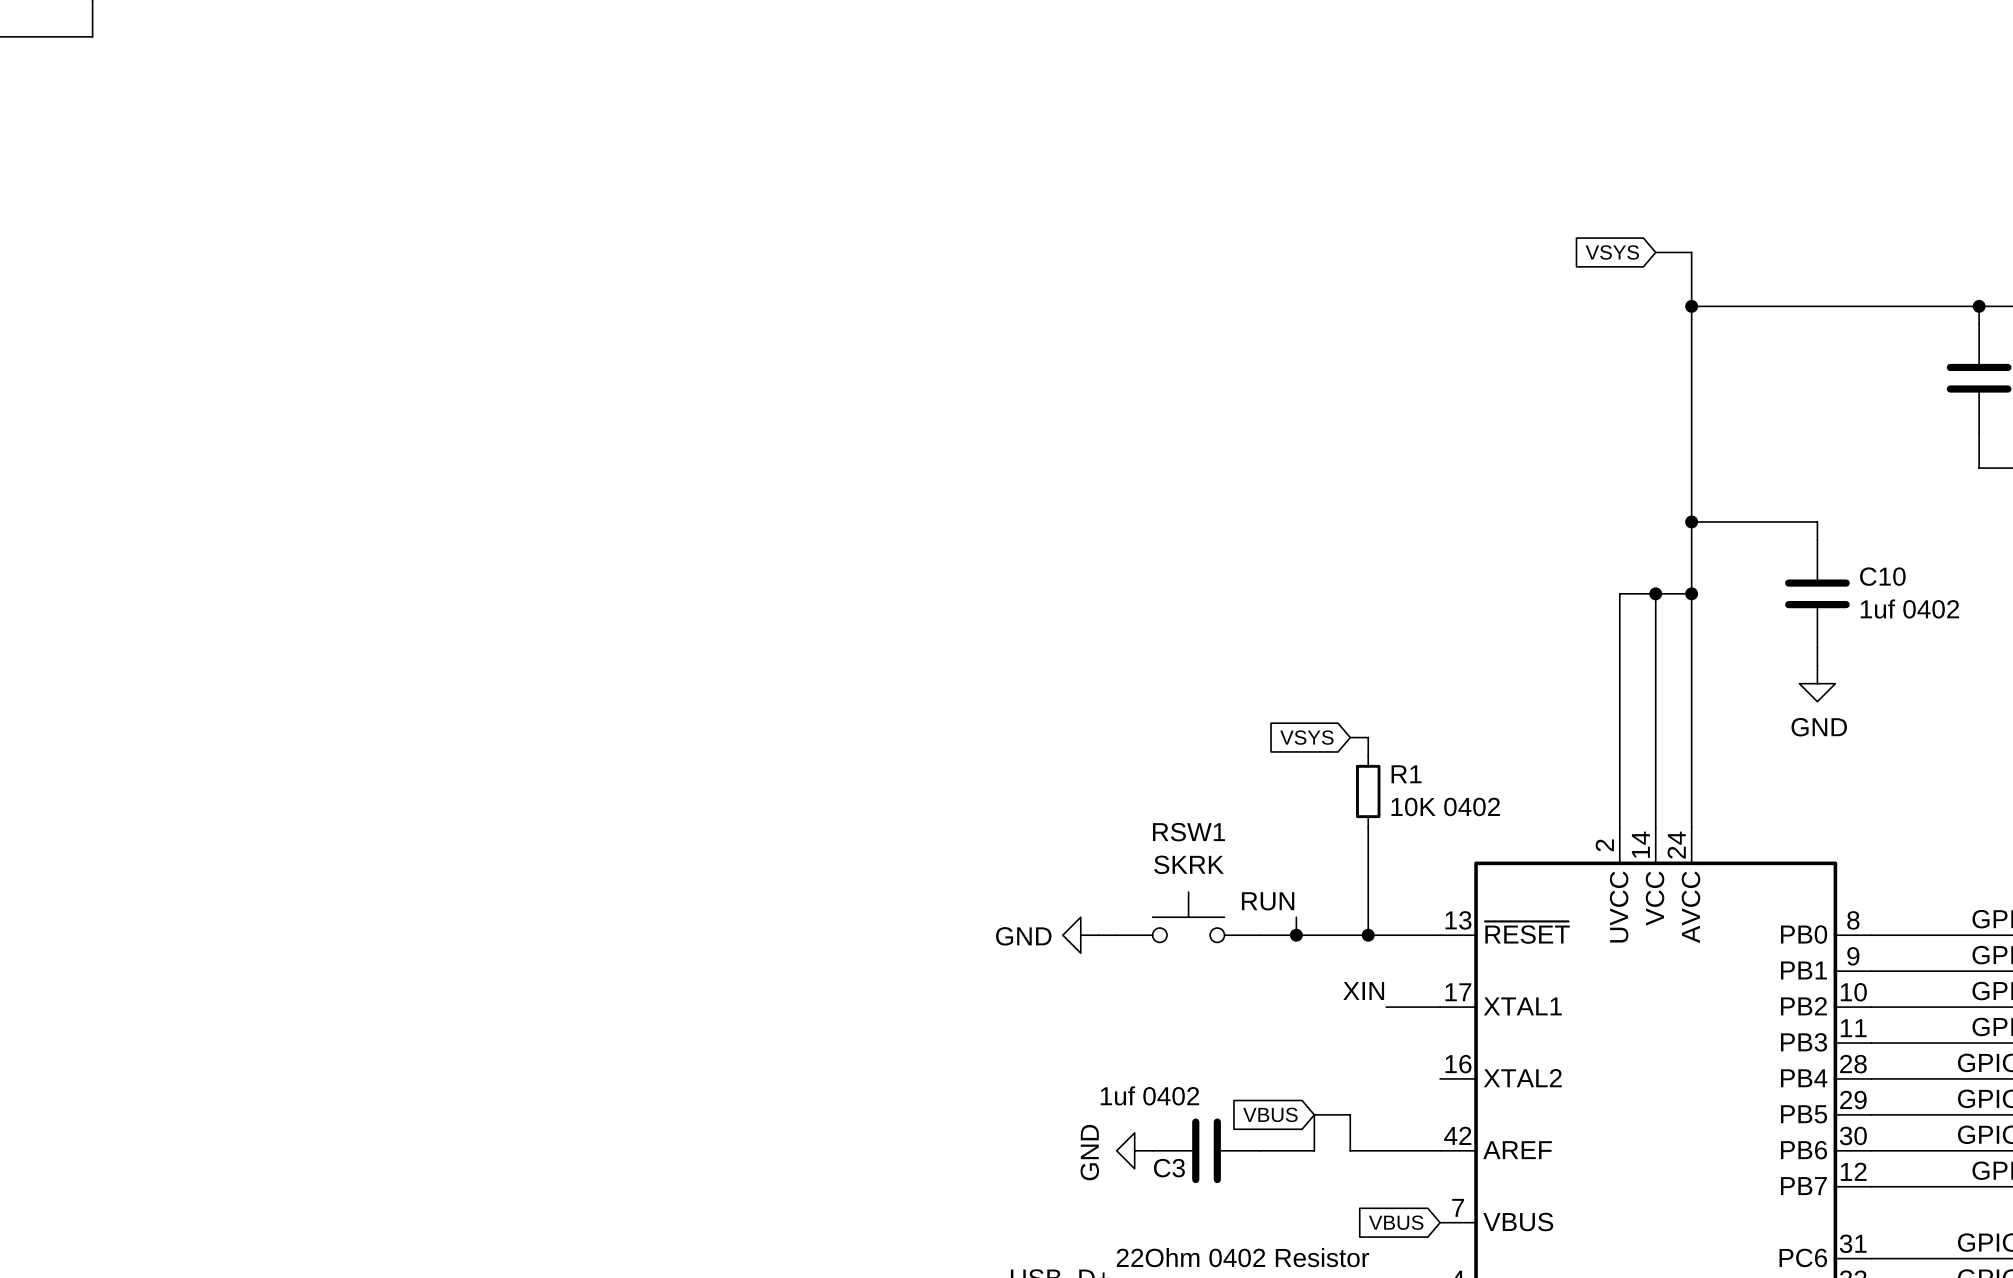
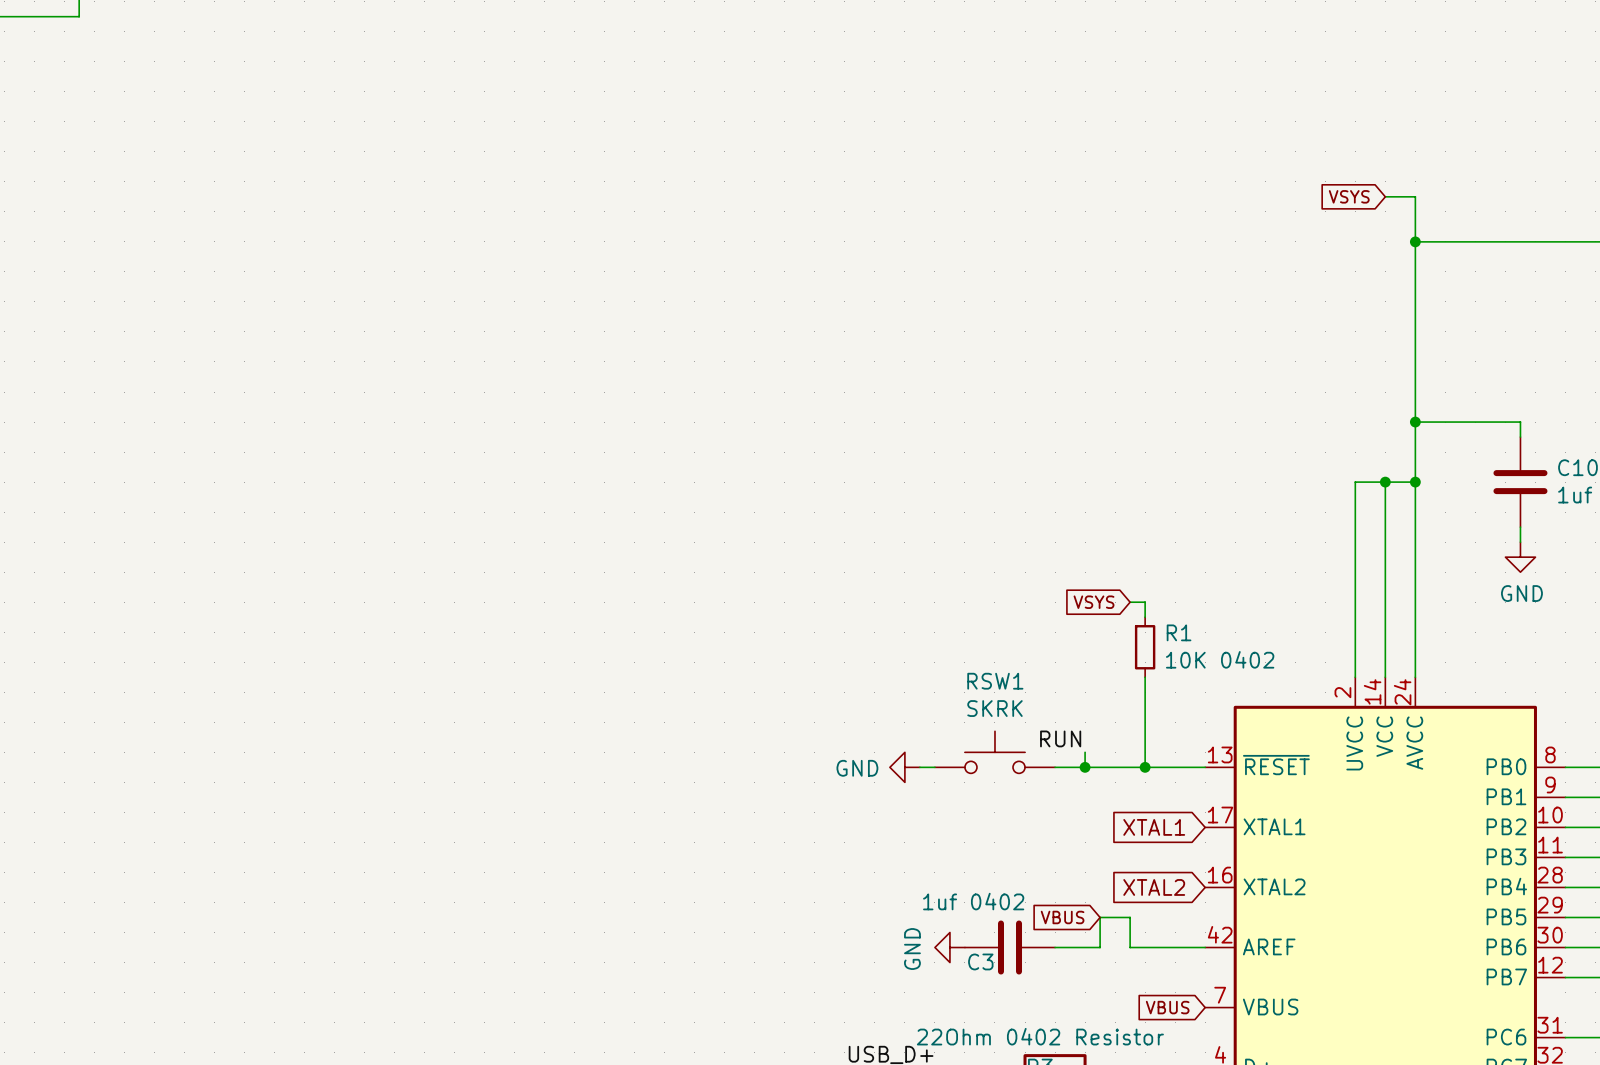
label: XIN (1363, 991) -> none
global label: none -> XTAL1 (1154, 827)
wire: (1386, 1007) (1440, 1007) -> none
global label: none -> XTAL2 (1154, 887)

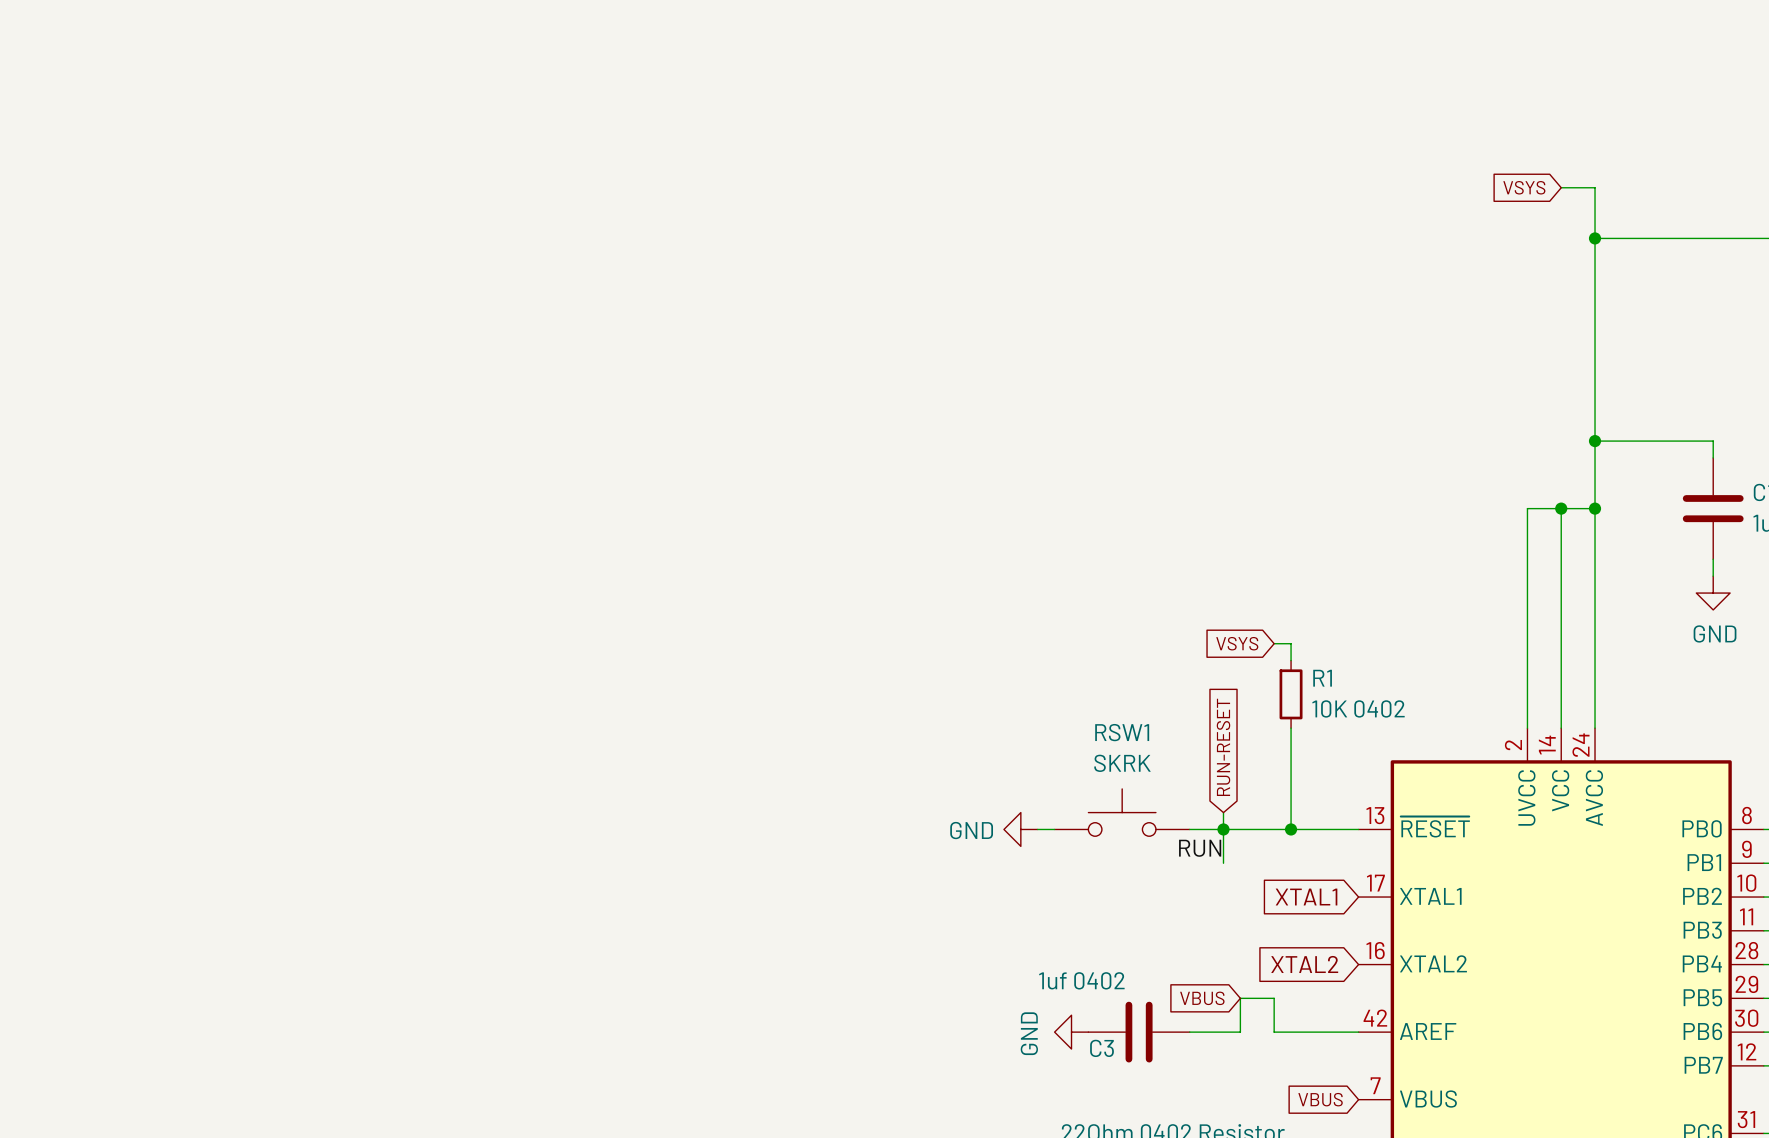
global label: none -> RUN-RESET (1223, 747)
label position: RUN (1060, 738) -> RUN (1200, 848)
wire: none -> (1223, 829) (1223, 863)

